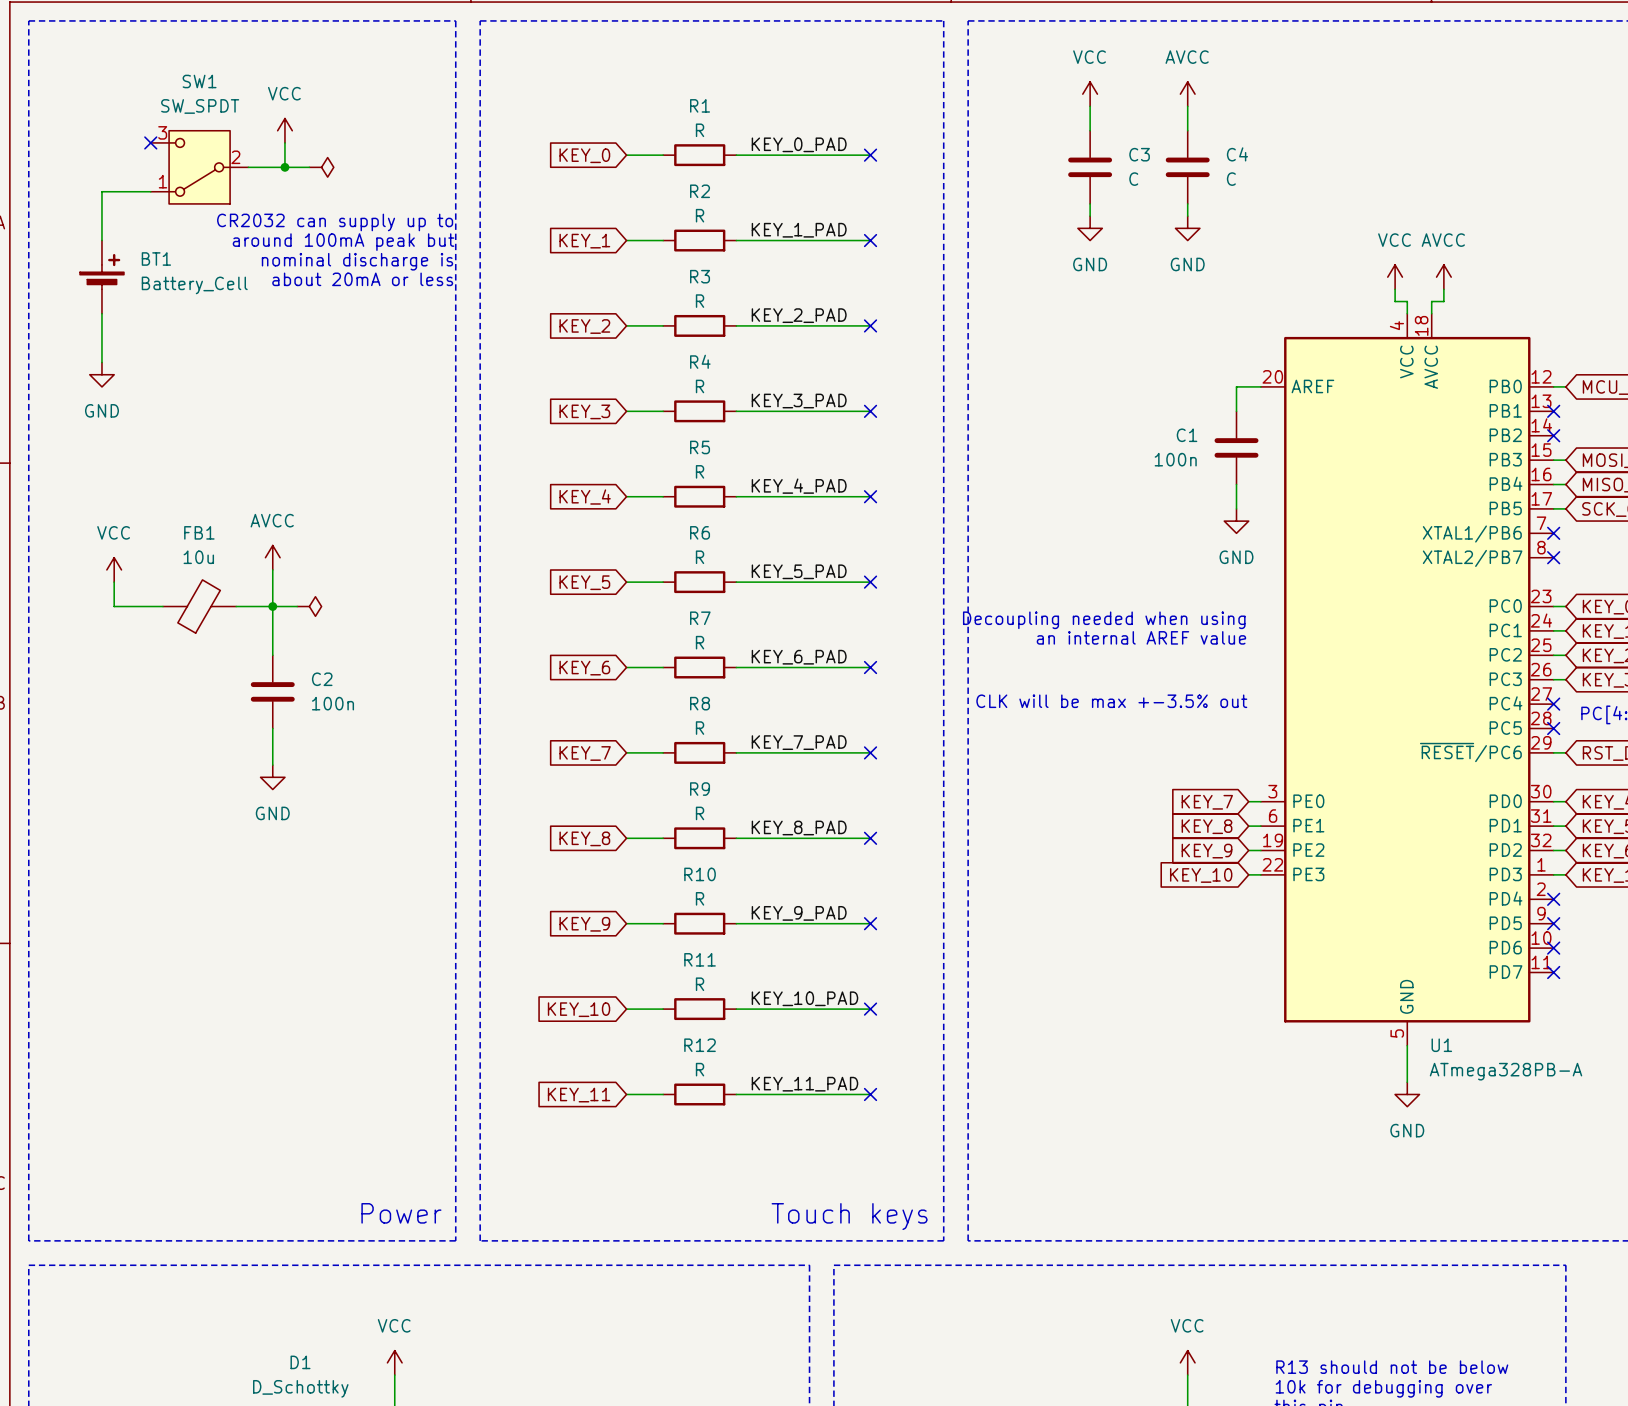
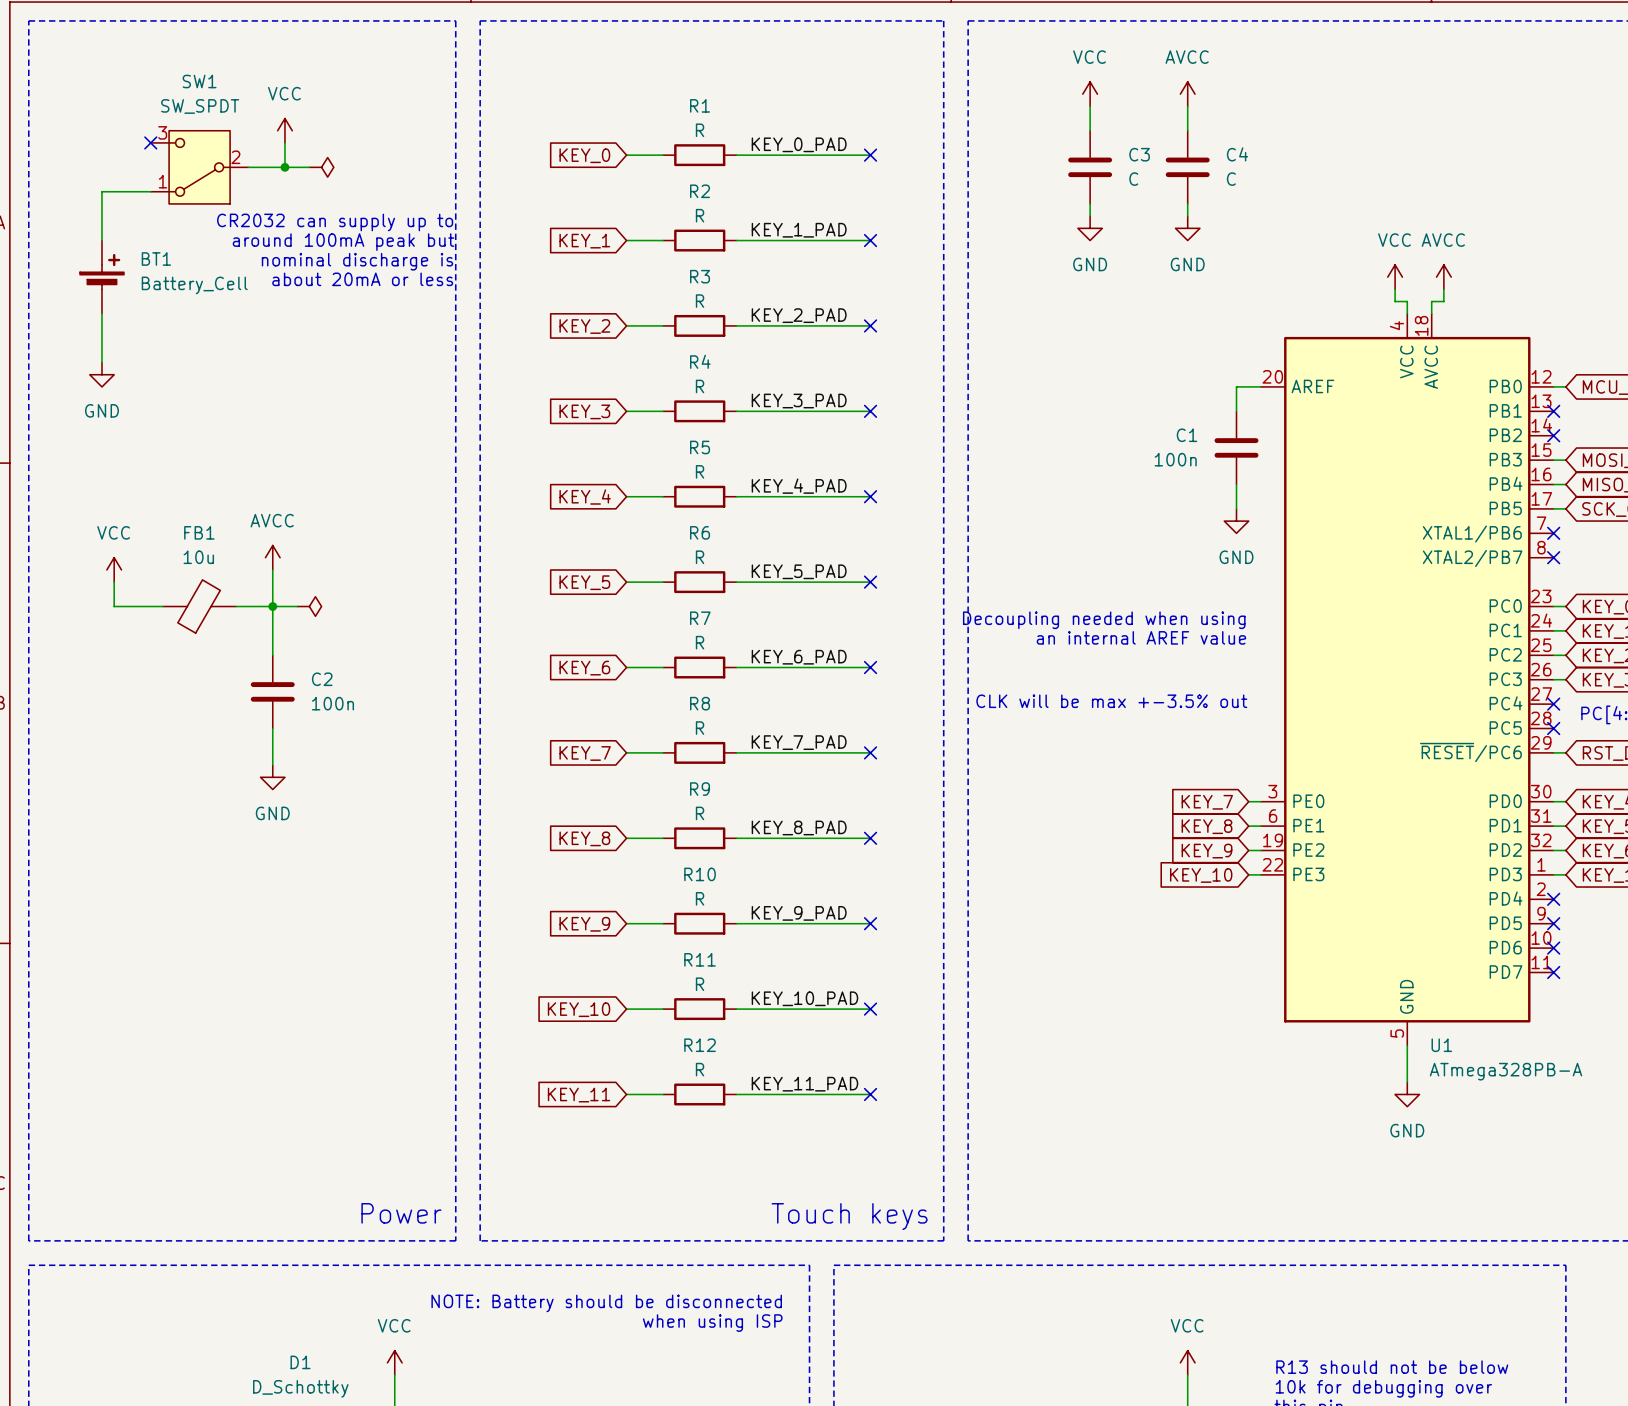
text: none -> NOTE: Battery should be disconnected (606, 1303)
text: none -> when using ISP (712, 1323)

